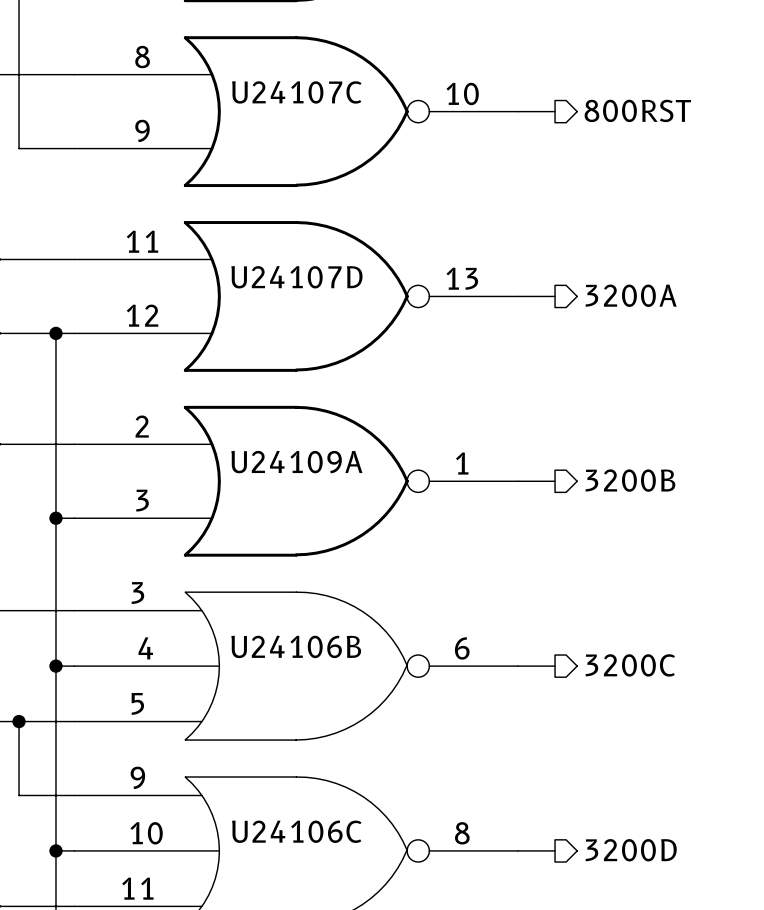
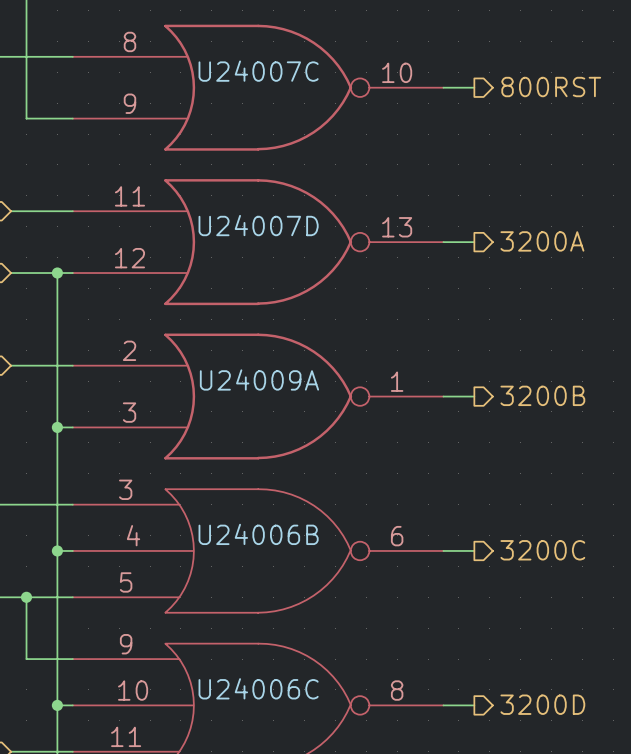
U24107C name: U24107C (296, 92) -> U24007C (258, 71)
U24107D name: U24107D (296, 277) -> U24007D (258, 225)
U24109A name: U24109A (296, 462) -> U24009A (259, 379)
U24106B name: U24106B (296, 646) -> U24006B (258, 534)
U24106C name: U24106C (296, 831) -> U24006C (258, 688)

